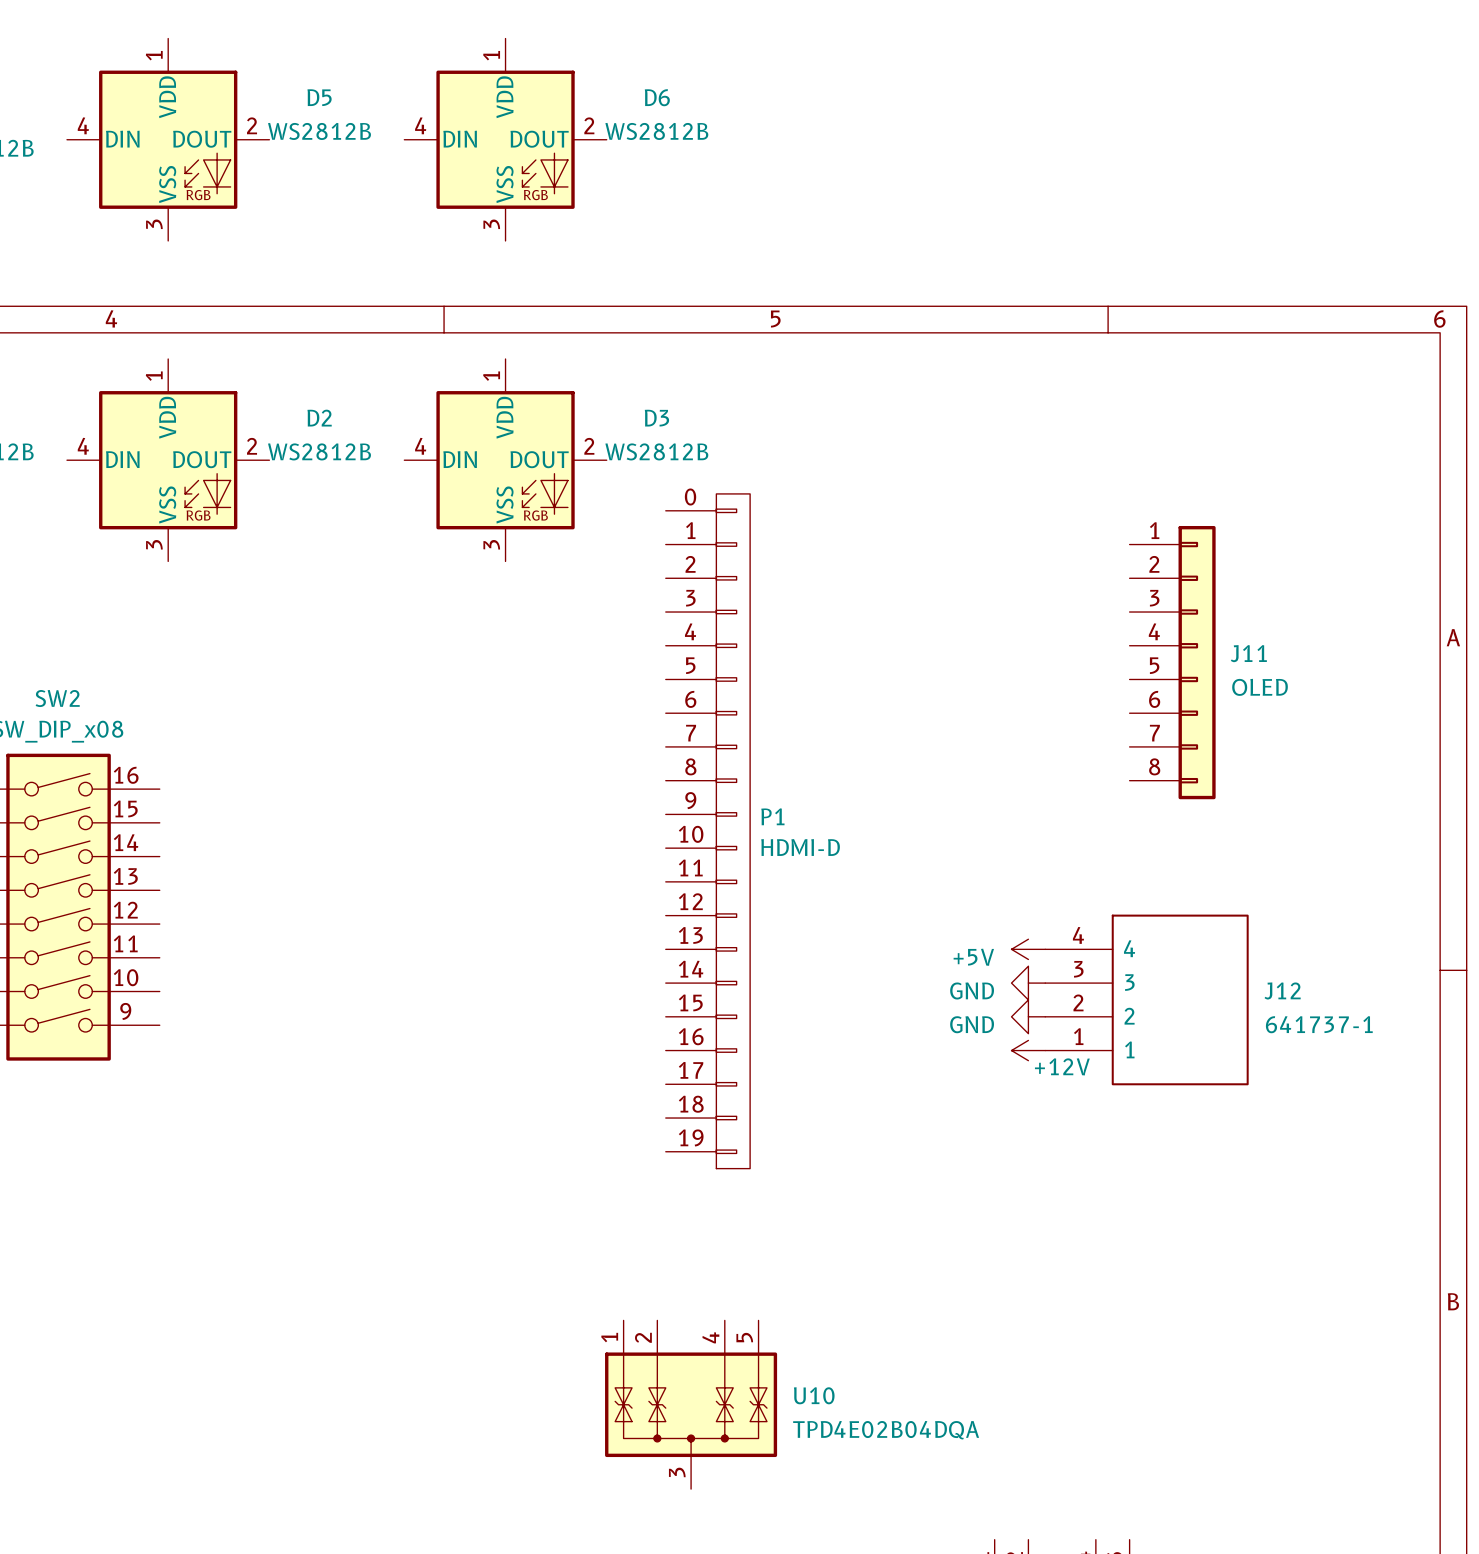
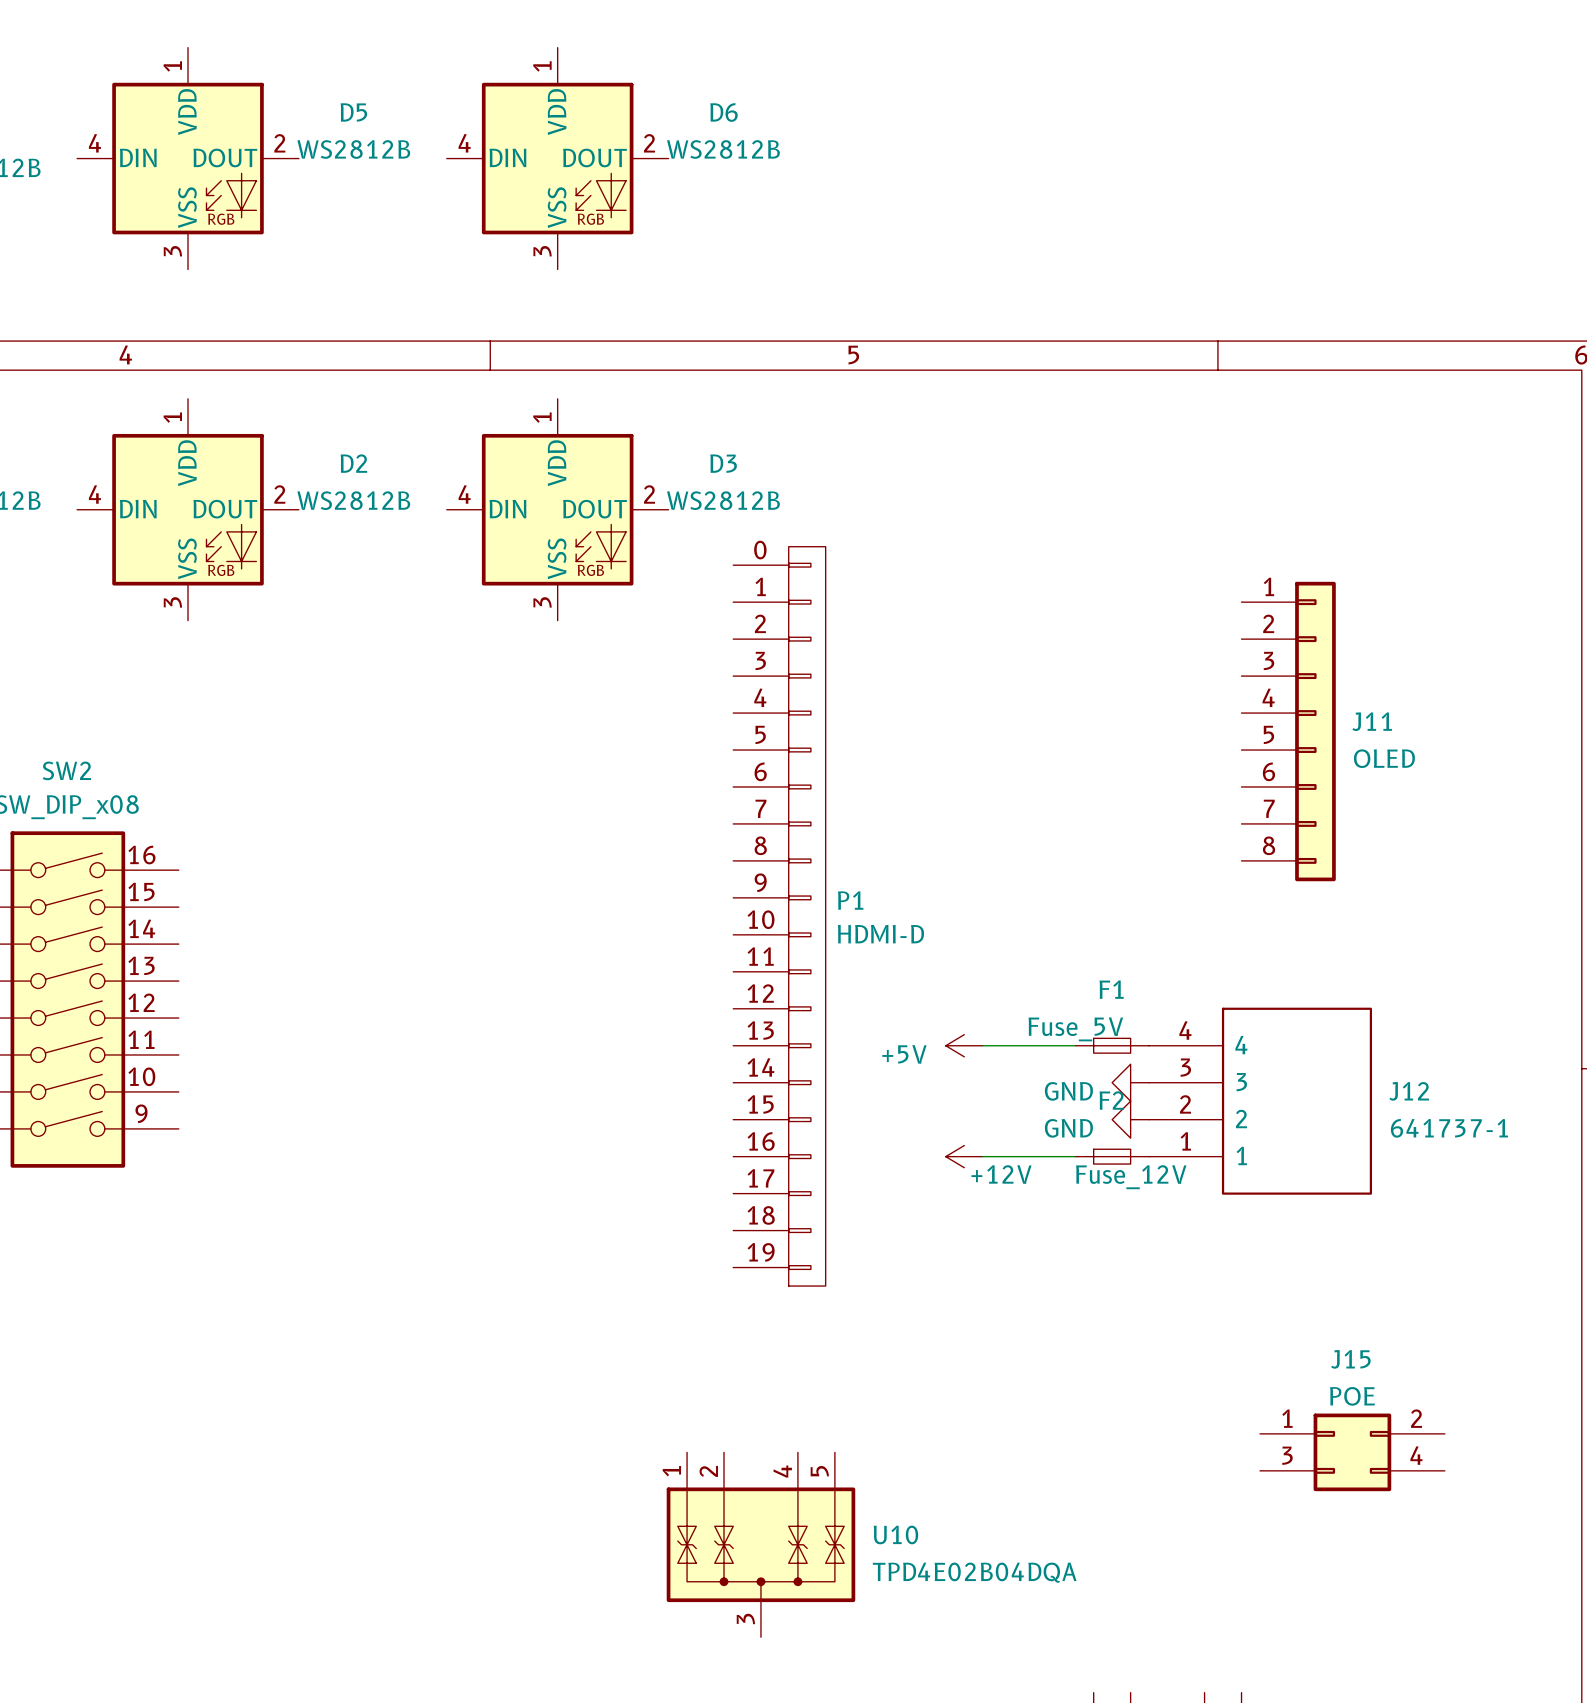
wire: none -> (982, 1045) (1075, 1045)
F1: none -> Fuse_5V (1112, 1045)
power symbol position: +5V (1028, 949) -> +5V (964, 1045)
wire: none -> (982, 1156) (1075, 1156)
F2: none -> Fuse_12V (1112, 1156)
power symbol position: +12V (1028, 1050) -> +12V (964, 1156)
J15: none -> POE (1352, 1452)

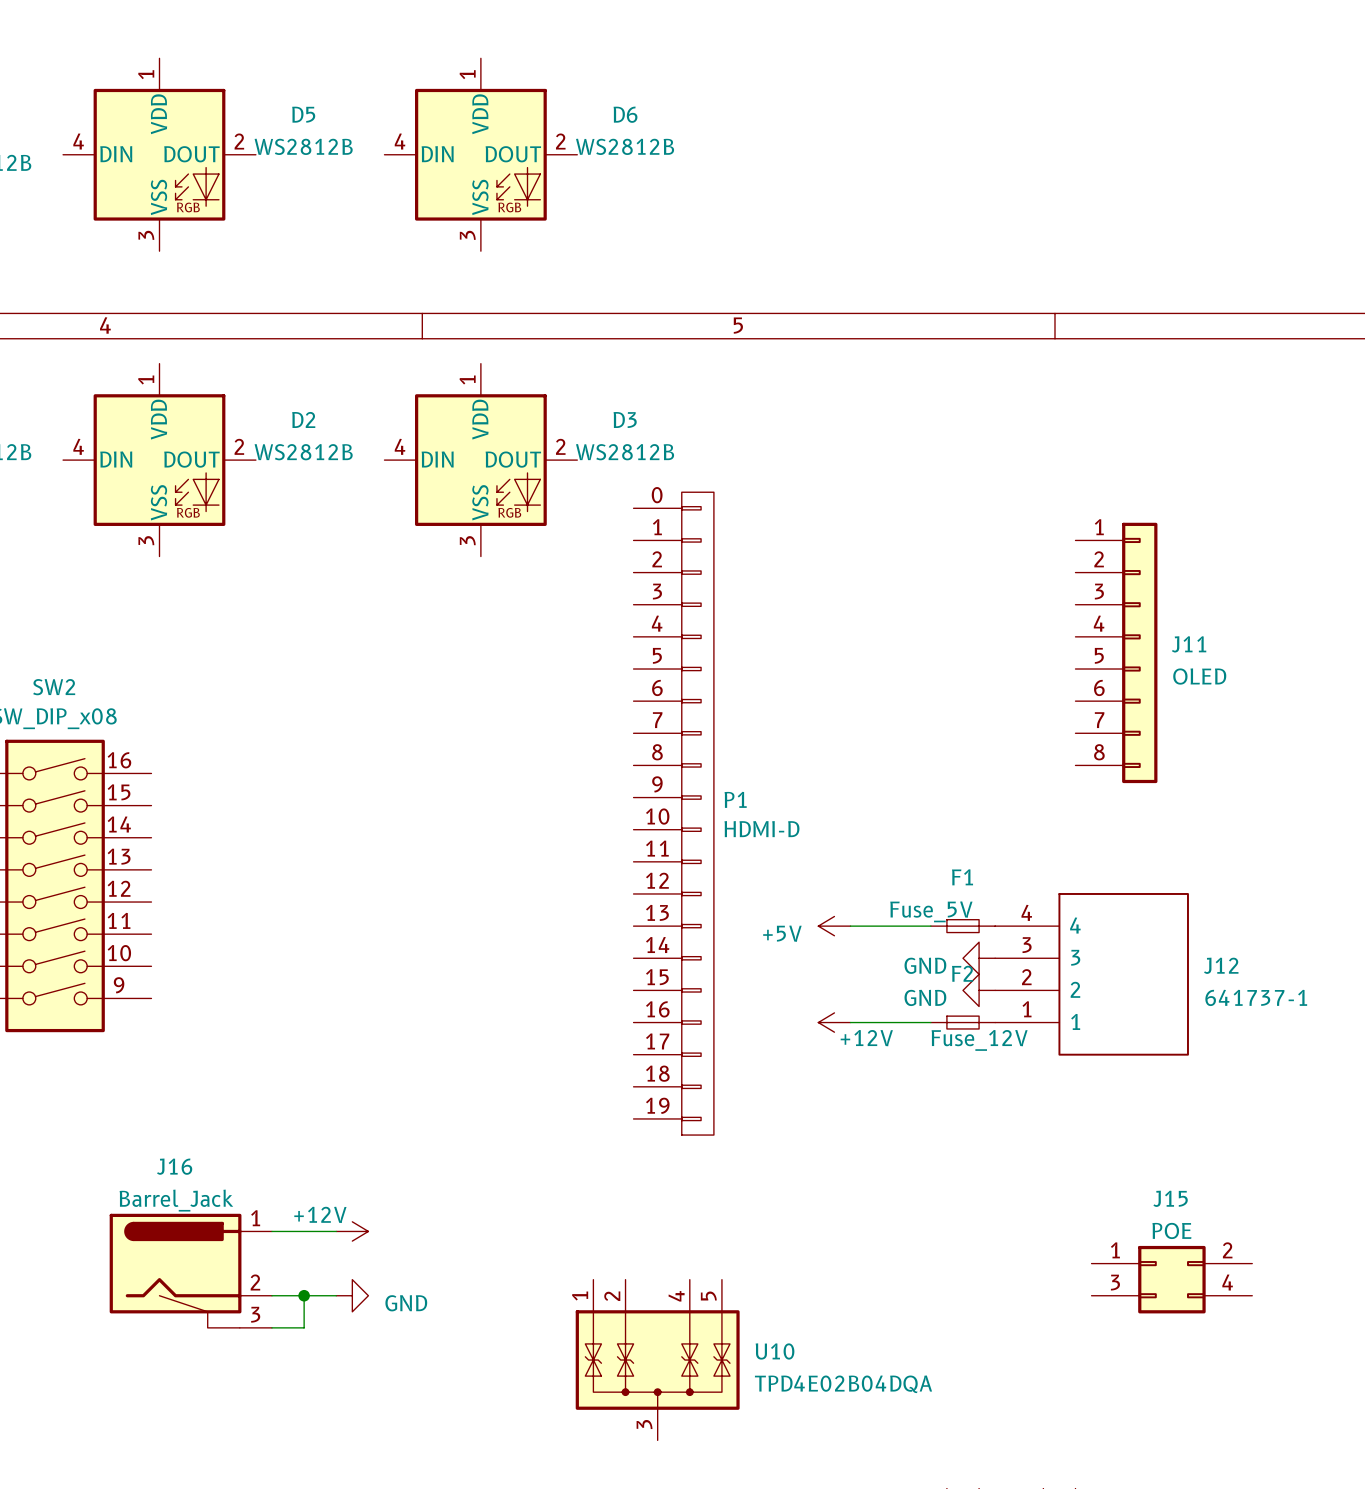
wire: none -> (271, 1231) (336, 1231)
power symbol: none -> +12V (352, 1231)
J16: none -> Barrel_Jack (190, 1270)
wire: none -> (271, 1295) (336, 1295)
wire: none -> (304, 1295) (304, 1327) (271, 1327)
junction: none -> (304, 1295)
power symbol: none -> GND (352, 1295)

